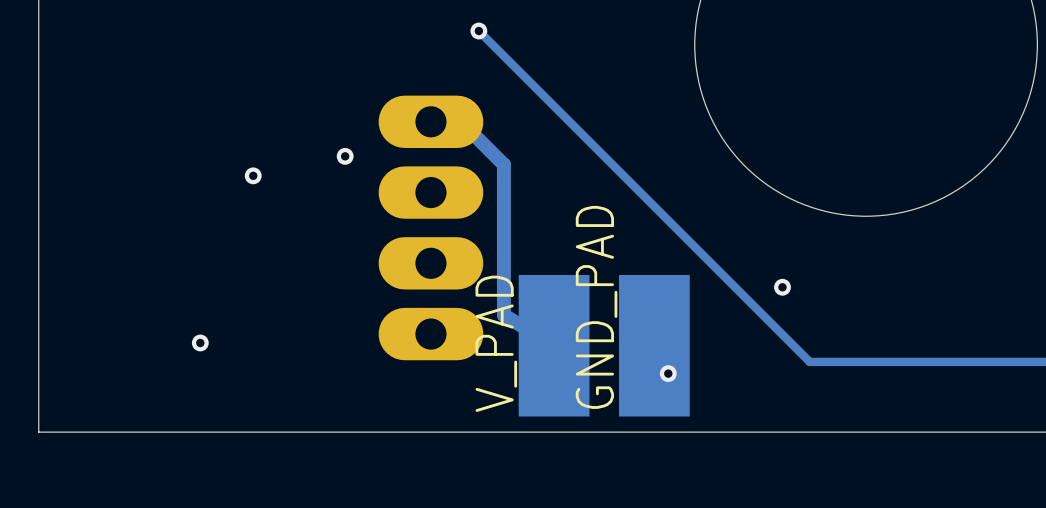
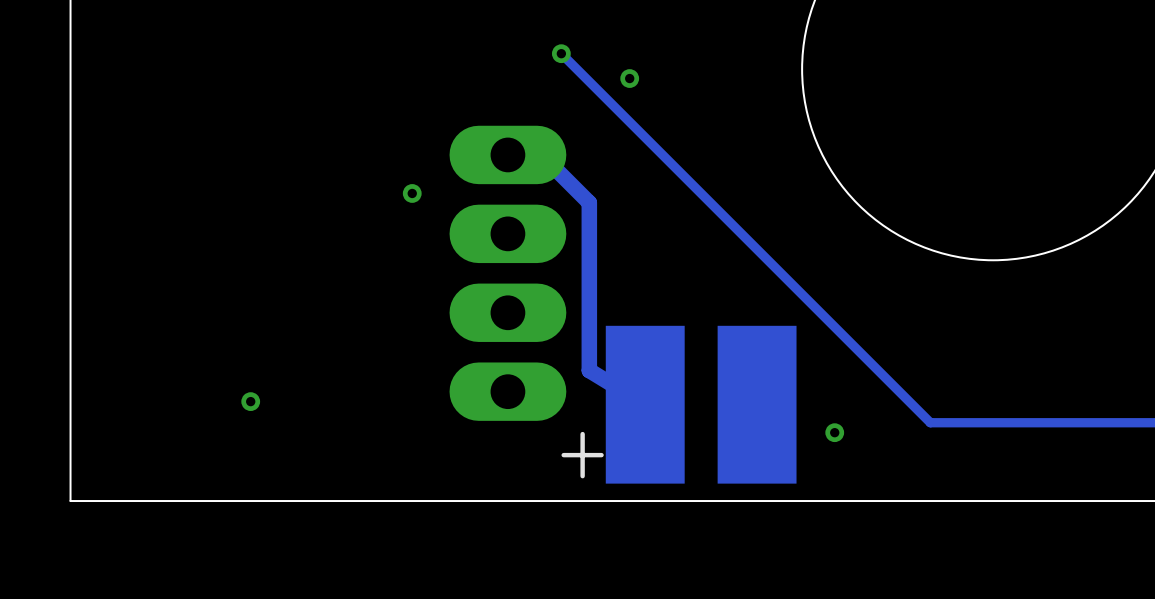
via: none -> (629, 78)
via: (253, 175) -> none
via: (782, 287) -> none
GND_PAD name: GND_PAD (596, 307) -> none
V_PAD name: V_PAD (496, 343) -> none
via: none -> (834, 432)
via: (668, 373) -> none
text: none -> + (582, 455)

